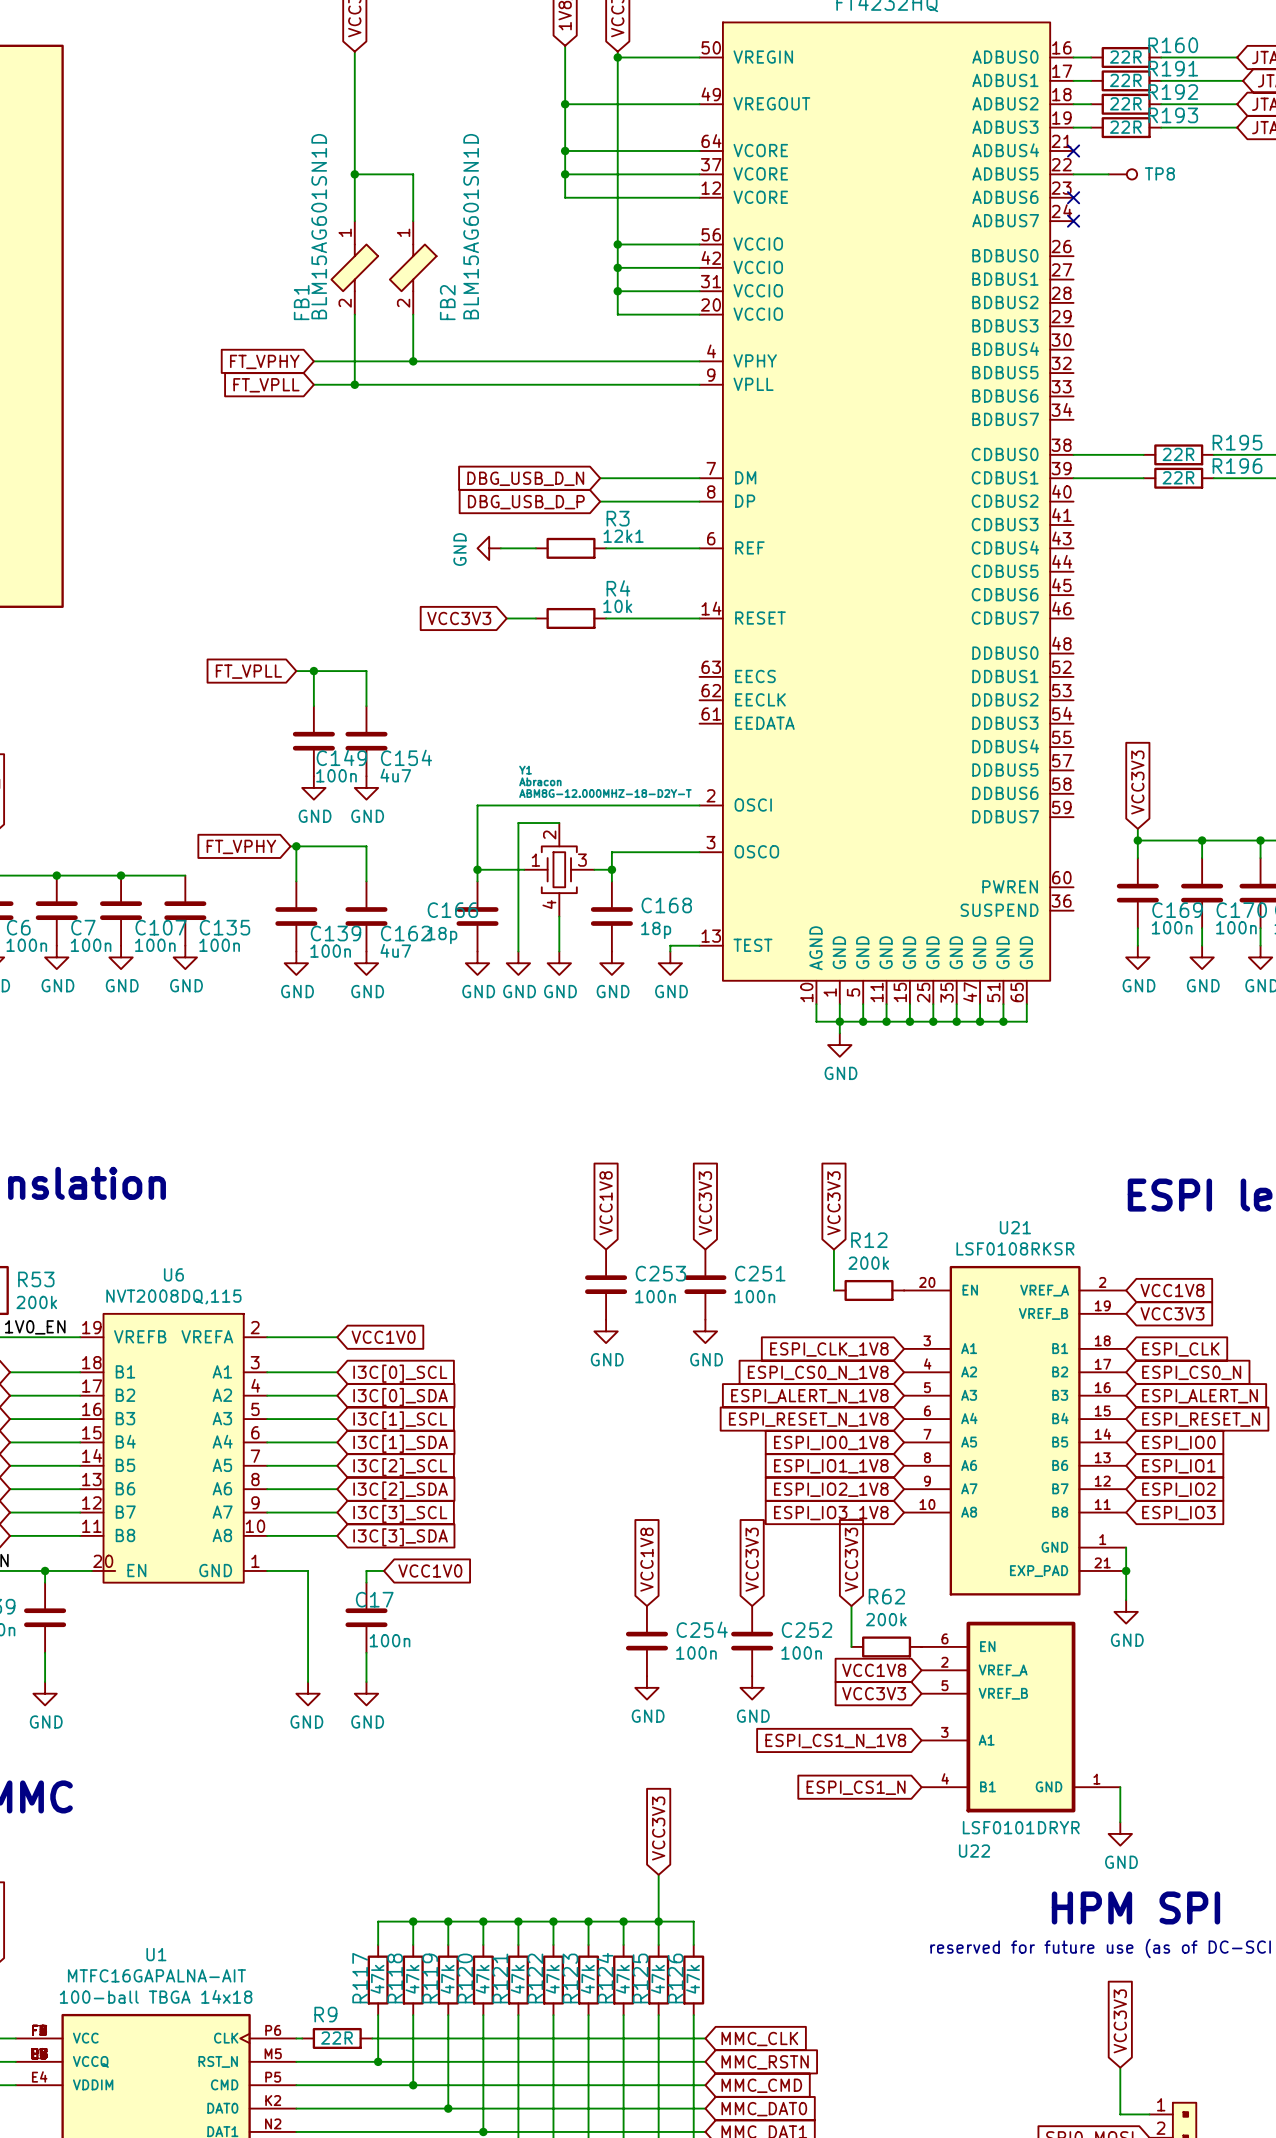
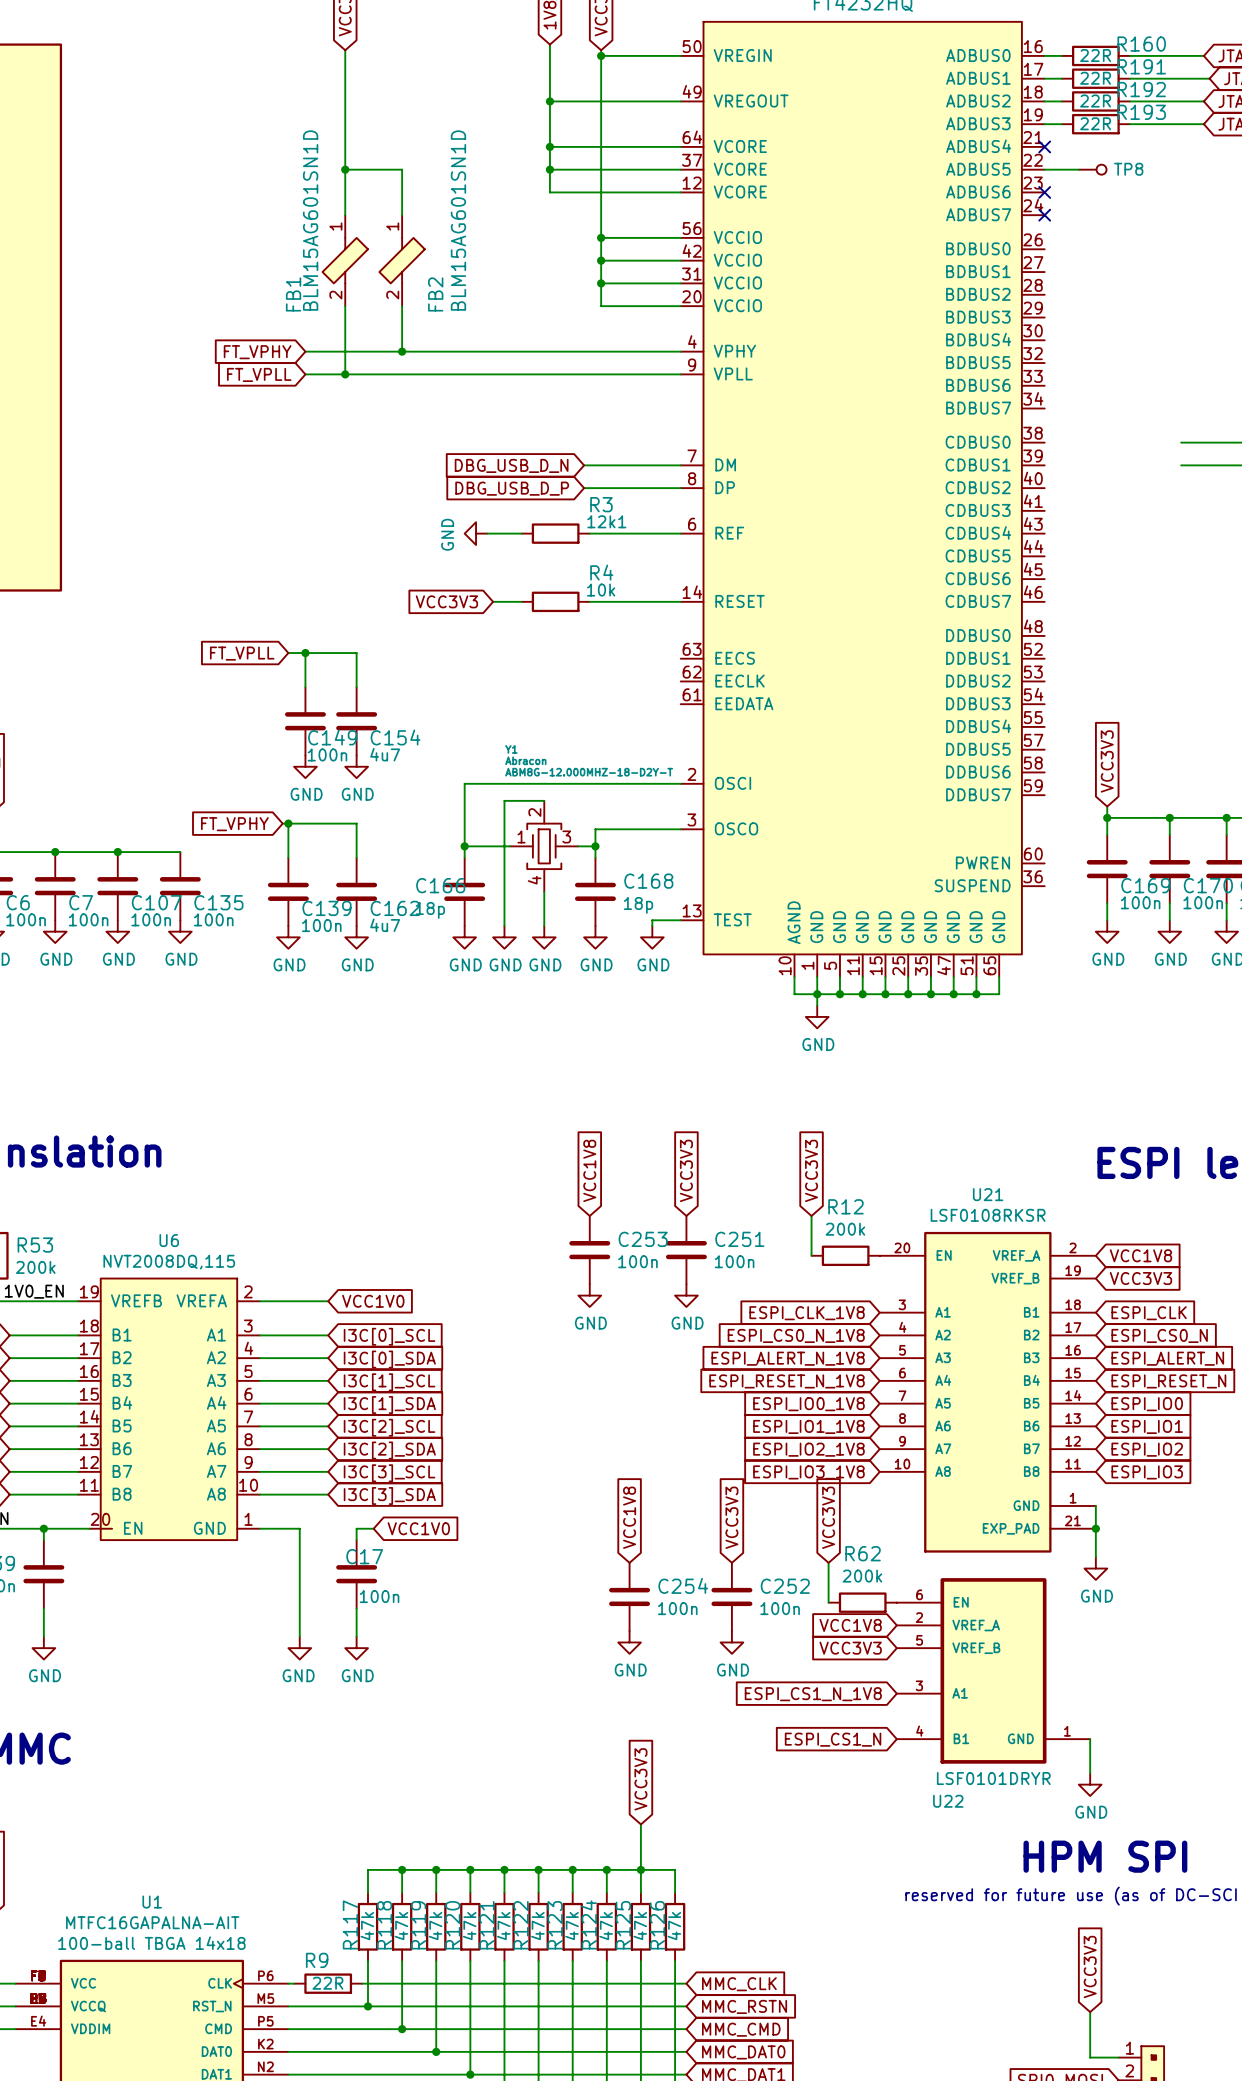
wire: (1073, 454) (1143, 454) -> none
R195: (1178, 454) -> none
wire: (1073, 478) (1143, 478) -> none
R196: (1178, 478) -> none

